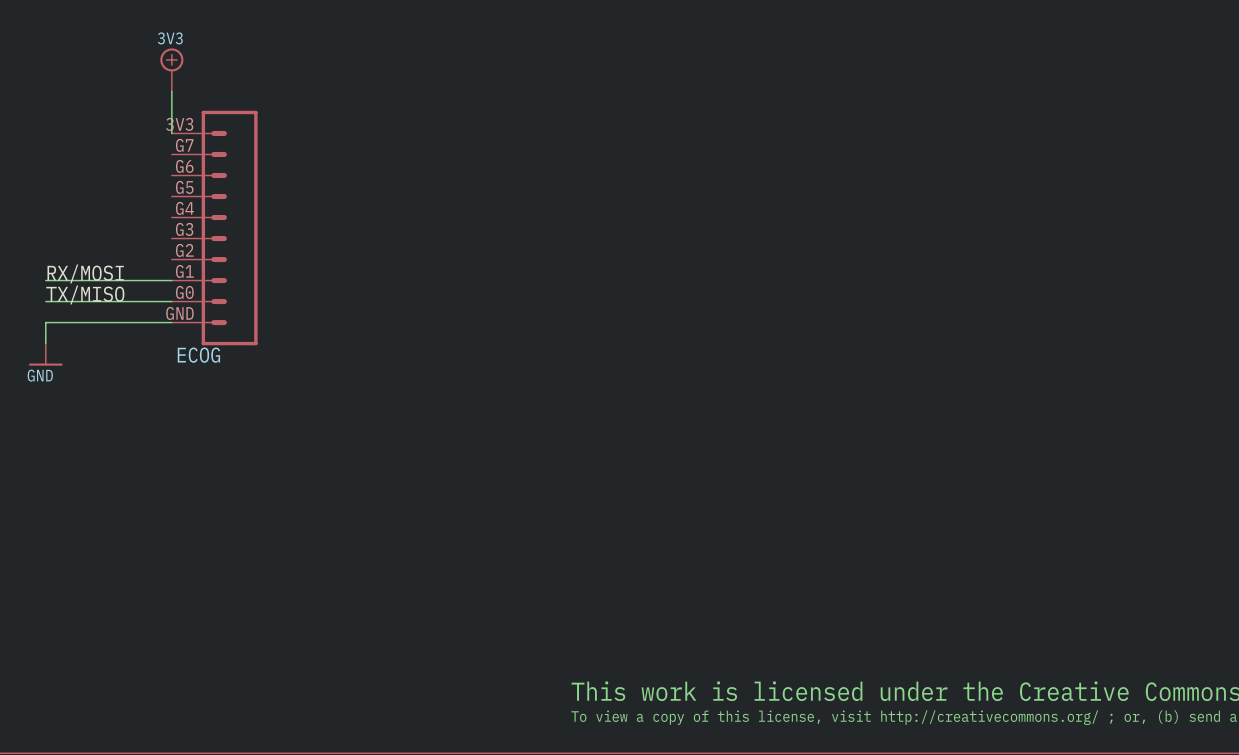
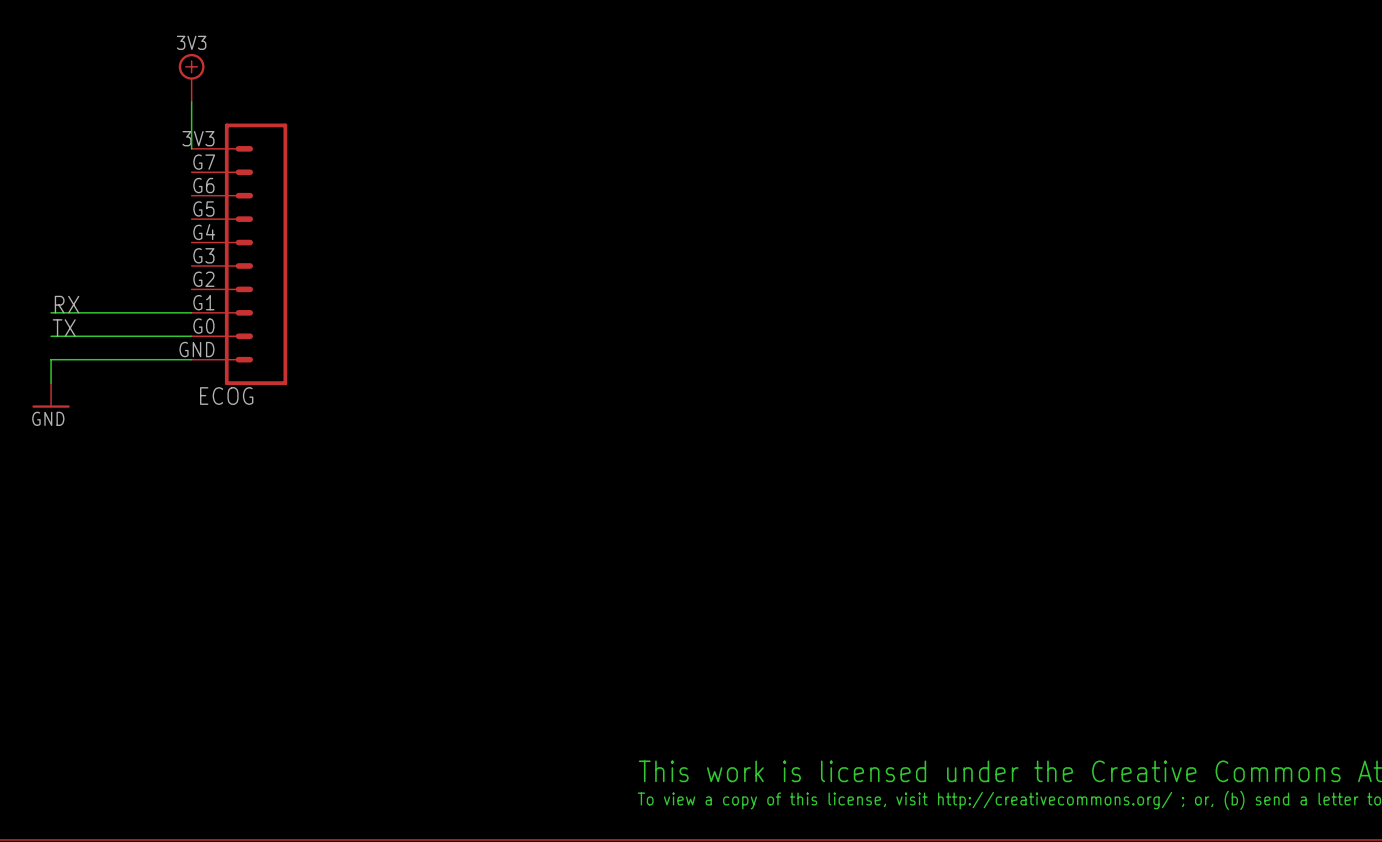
label: RX/MOSI (85, 273) -> RX (67, 304)
label: TX/MISO (85, 295) -> TX (64, 328)

